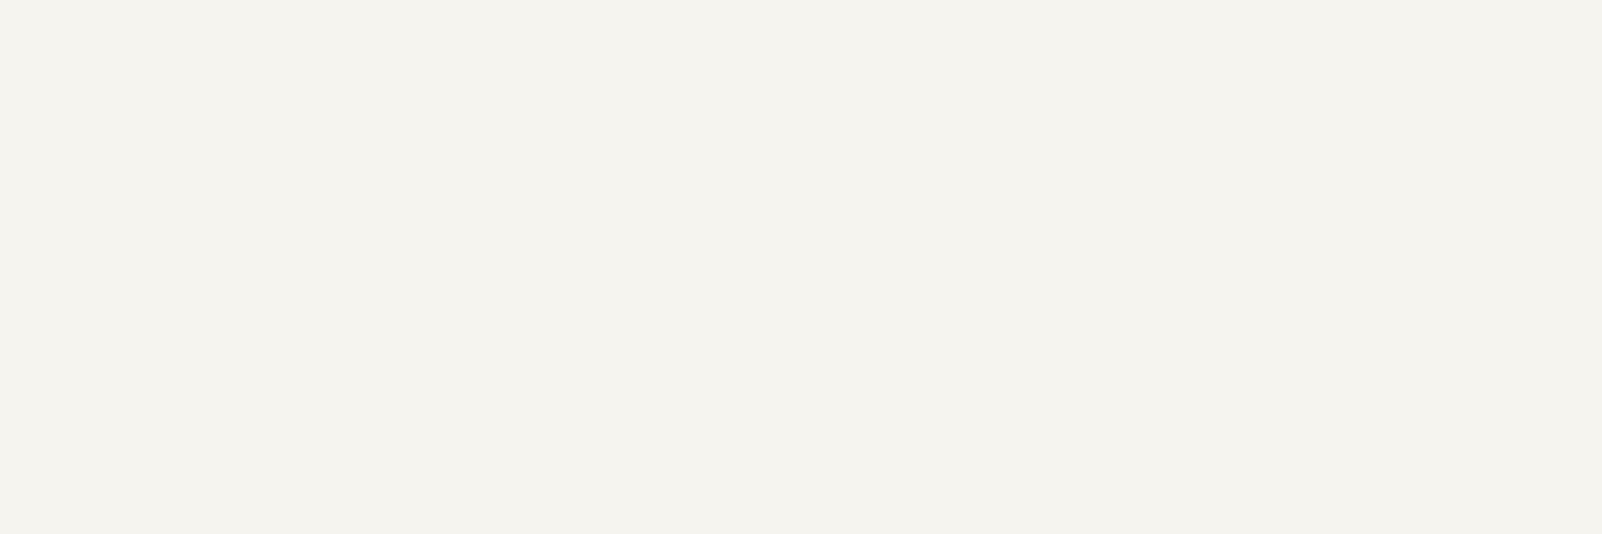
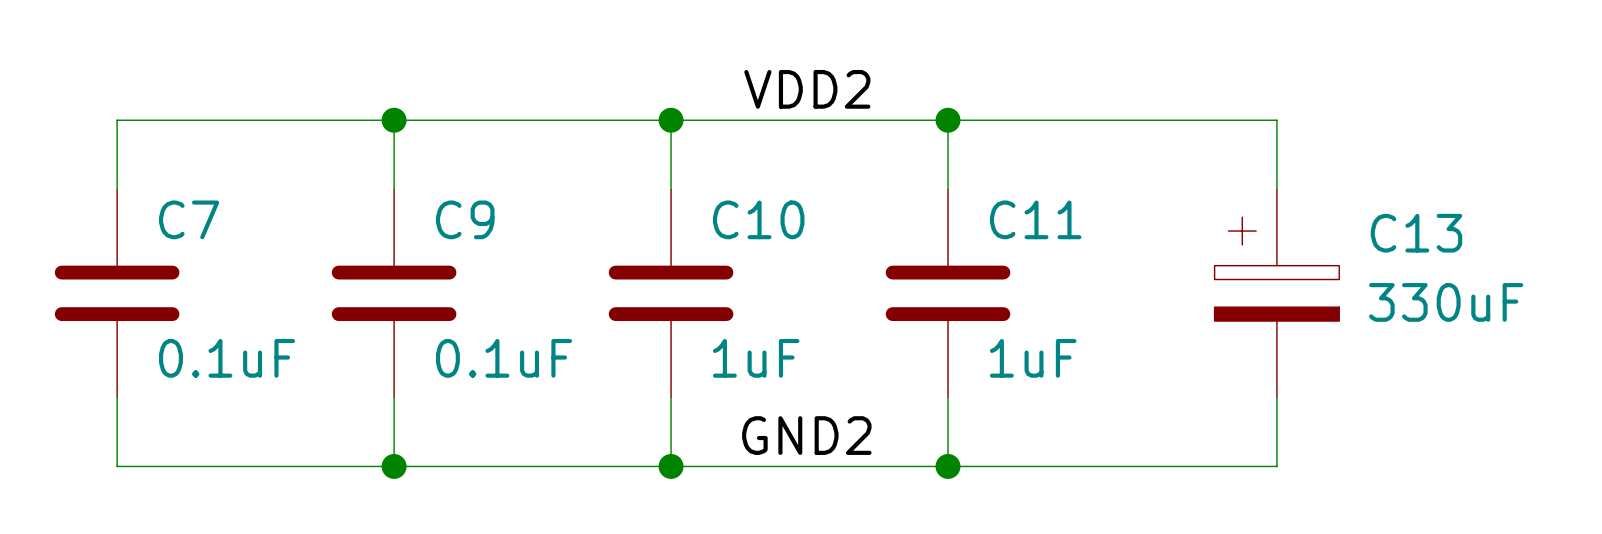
label: none -> VDD2 (807, 89)
wire: none -> (394, 120) (394, 189)
junction: none -> (394, 120)
wire: none -> (671, 120) (671, 189)
junction: none -> (671, 120)
wire: none -> (948, 120) (948, 189)
junction: none -> (948, 120)
wire: none -> (117, 189) (117, 120) (1276, 120) (1276, 189)
C7: none -> 0.1uF (117, 293)
C9: none -> 0.1uF (394, 293)
C10: none -> 1uF (671, 293)
C11: none -> 1uF (948, 293)
C13: none -> 330uF (1276, 293)
wire: none -> (117, 397) (117, 466) (1276, 466) (1276, 397)
wire: none -> (394, 397) (394, 466)
wire: none -> (671, 397) (671, 466)
wire: none -> (948, 397) (948, 466)
label: none -> GND2 (806, 435)
junction: none -> (394, 466)
junction: none -> (671, 466)
junction: none -> (948, 466)

